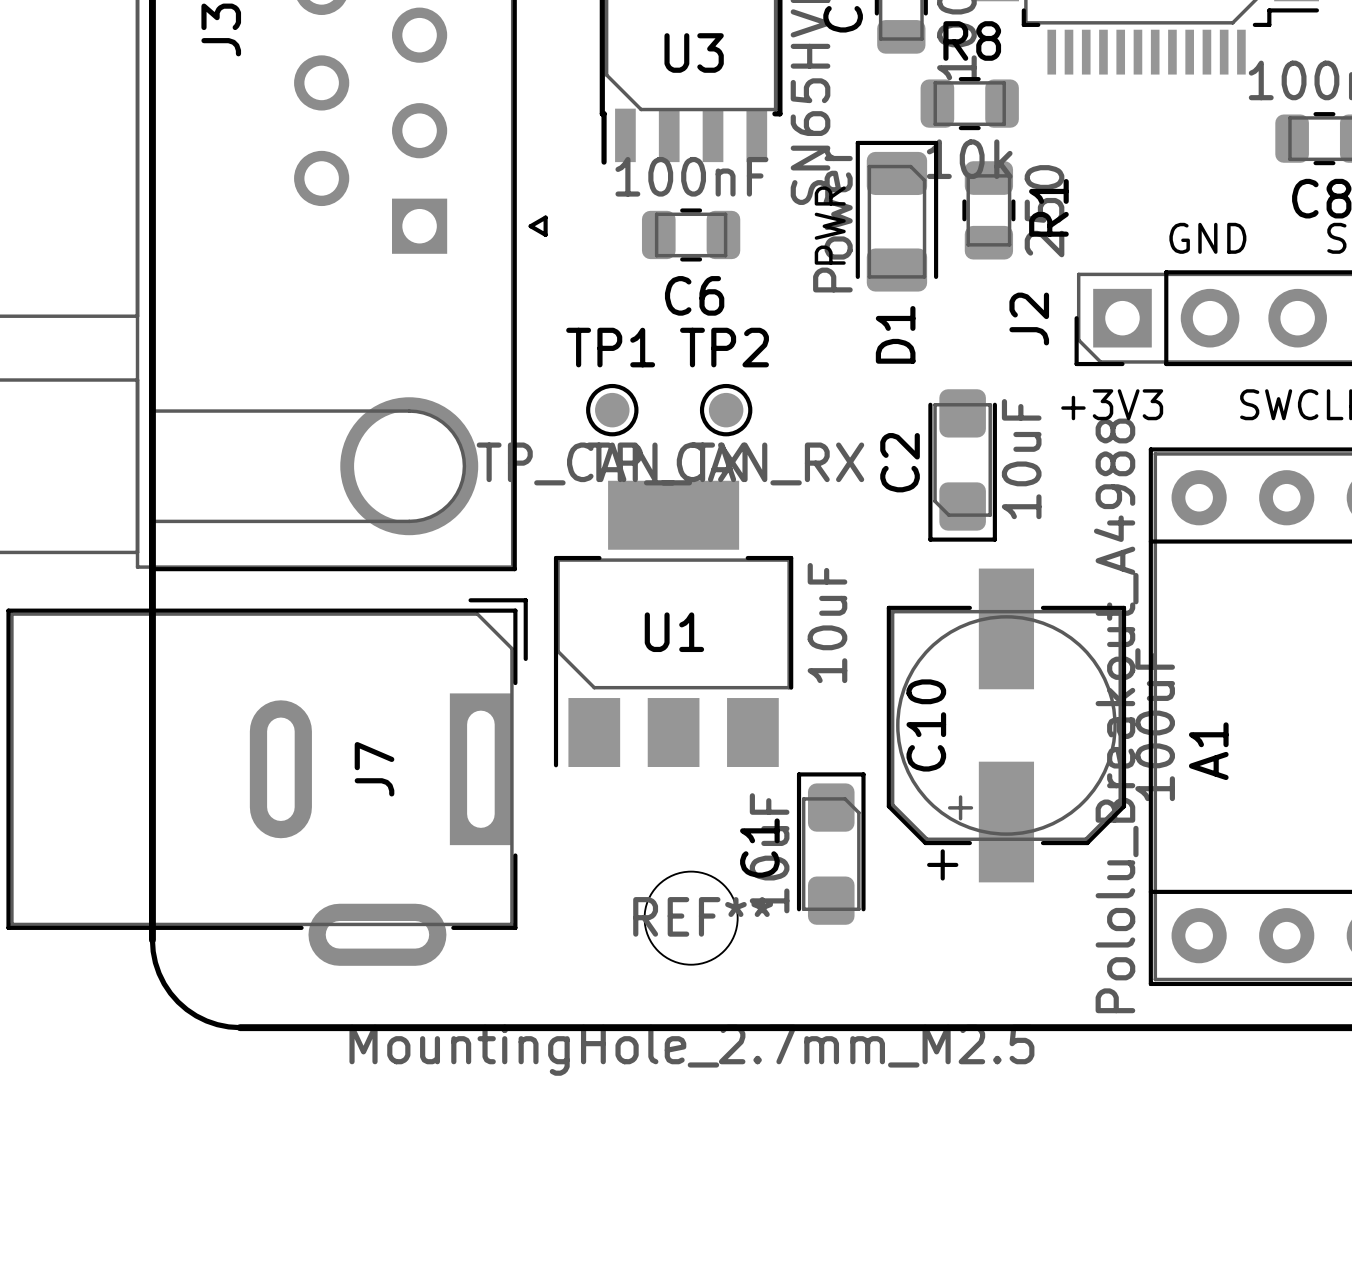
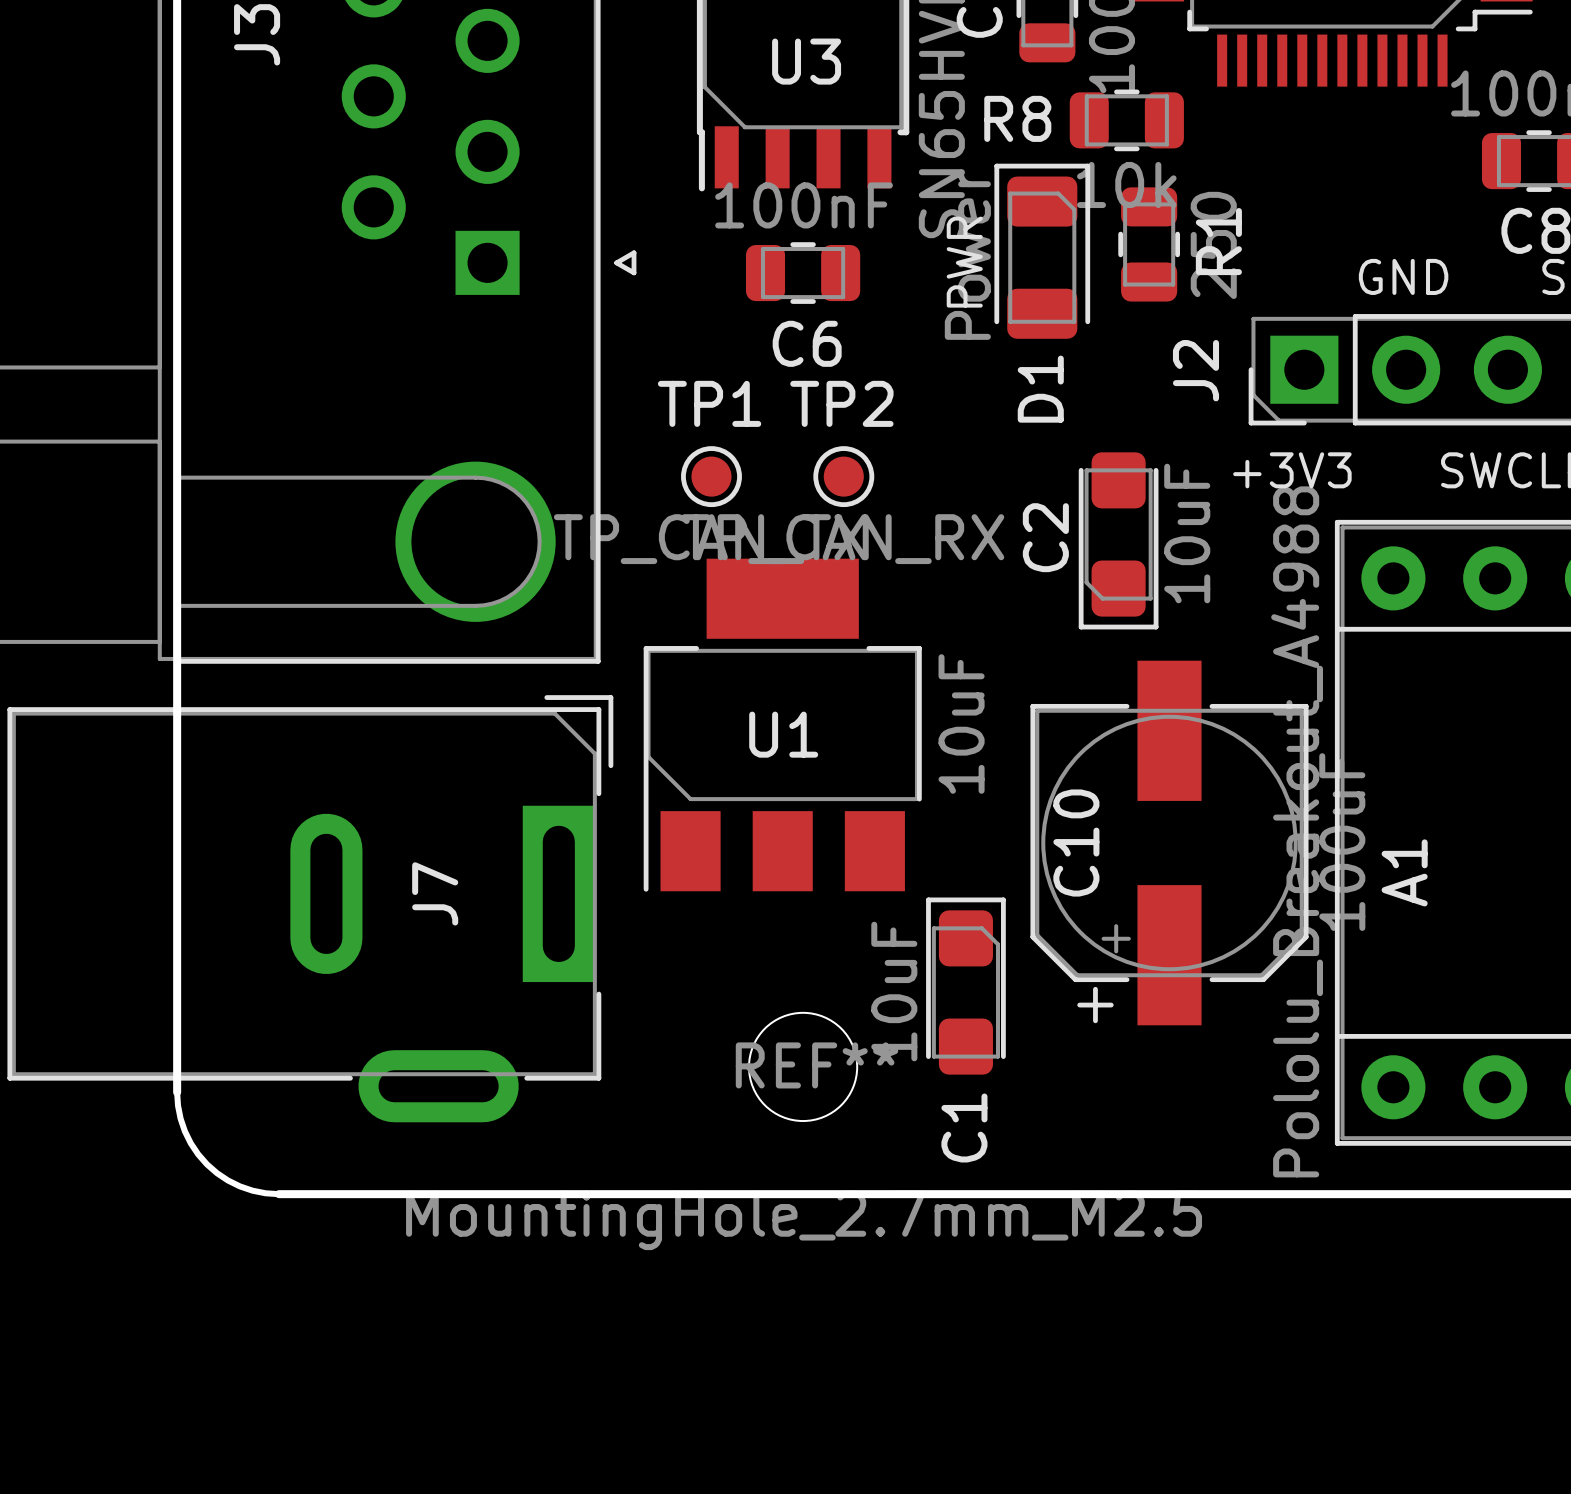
R8 name position: R8 (972, 40) -> R8 (1017, 118)
C1 name position: C1 (759, 848) -> C1 (964, 1127)

